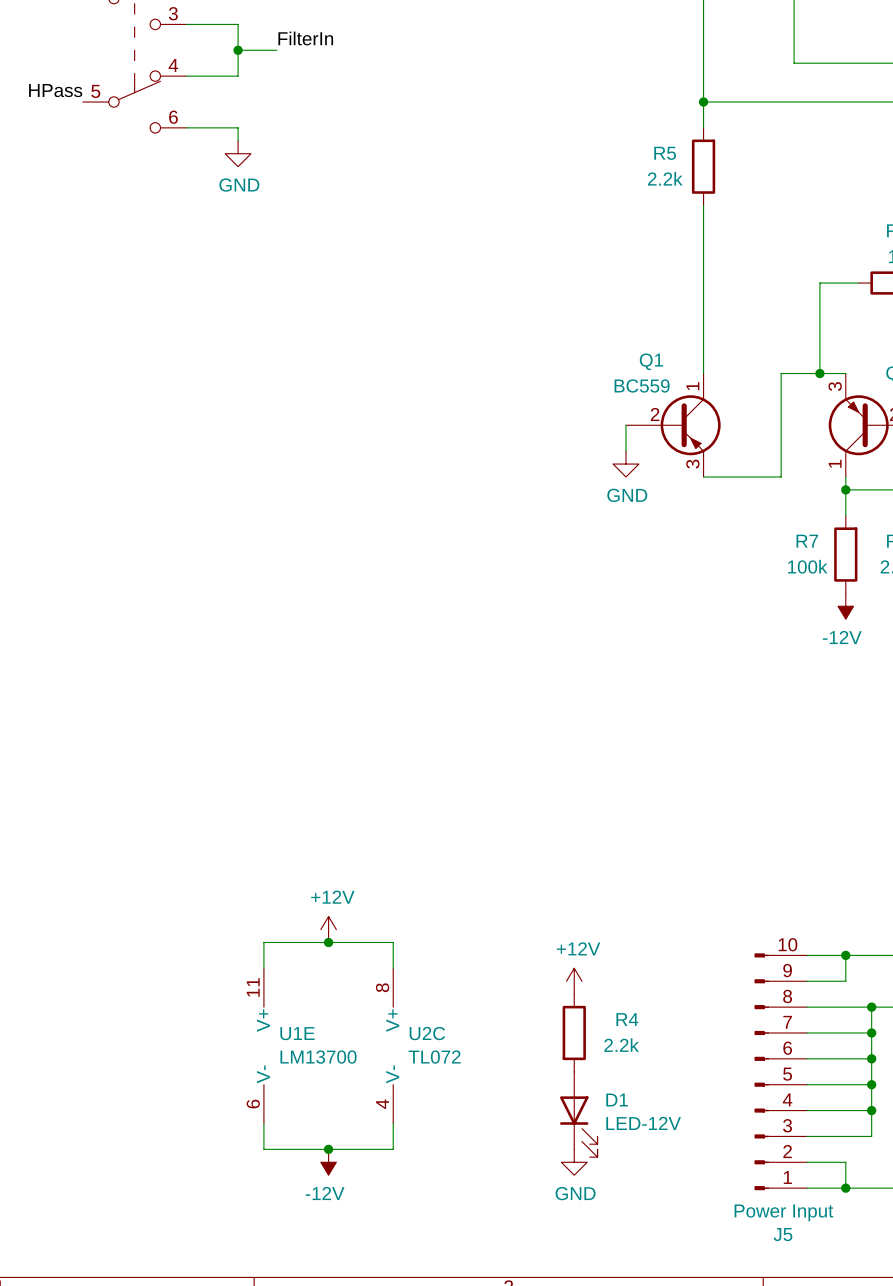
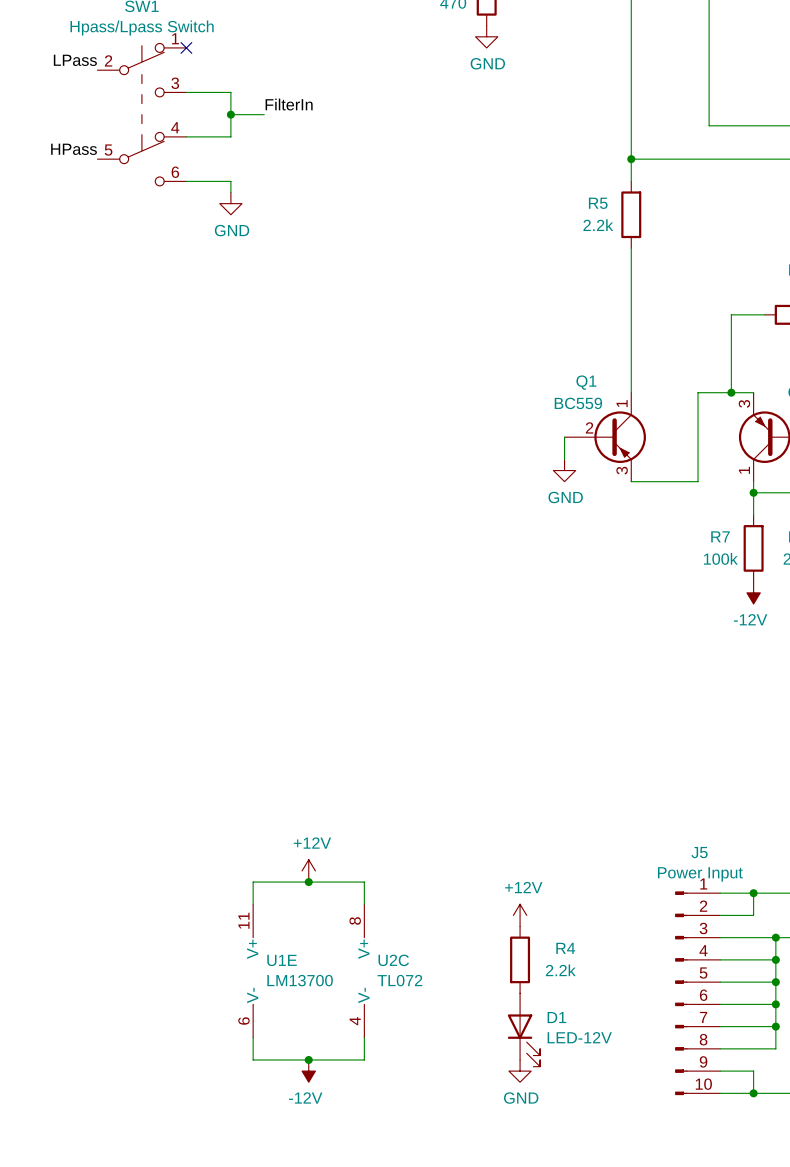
J5 flip: as is (761, 1071) -> up-down (681, 993)

